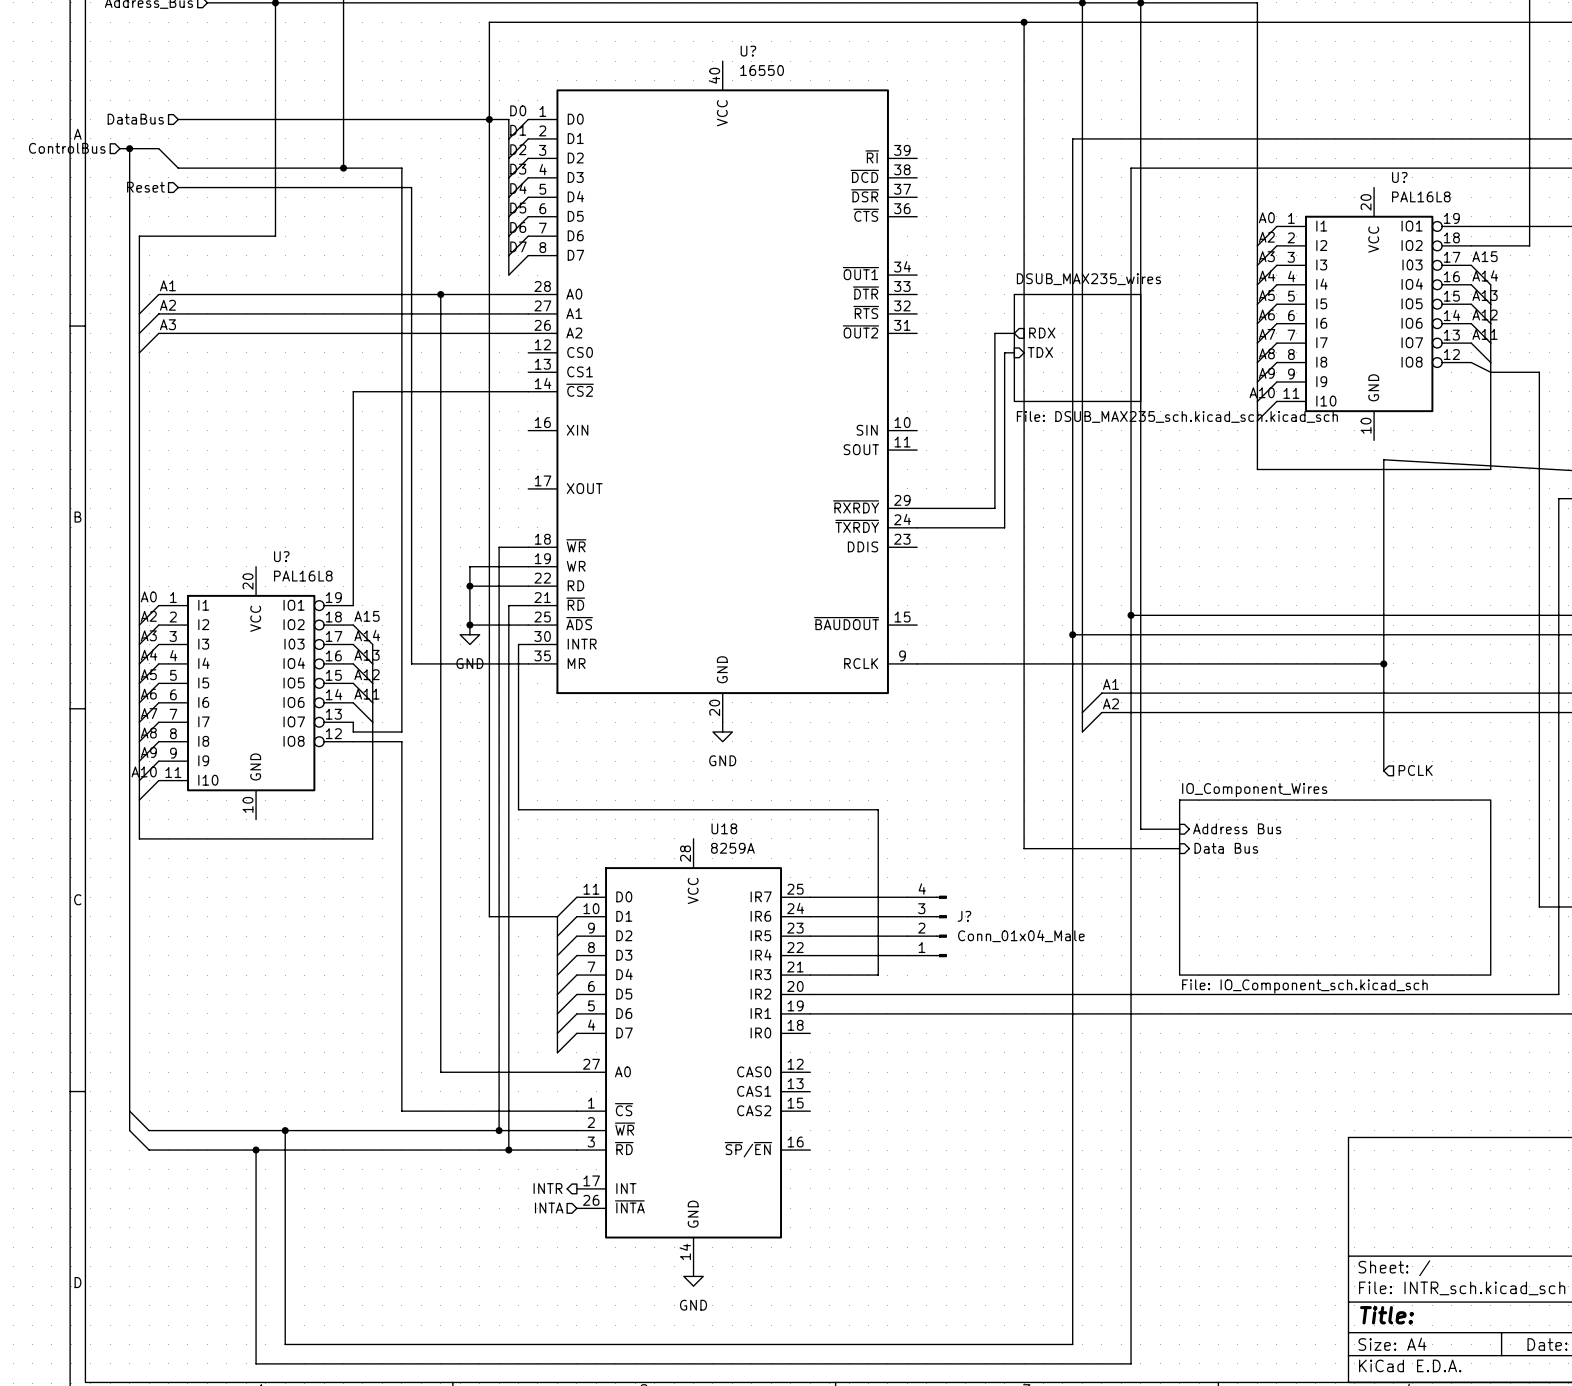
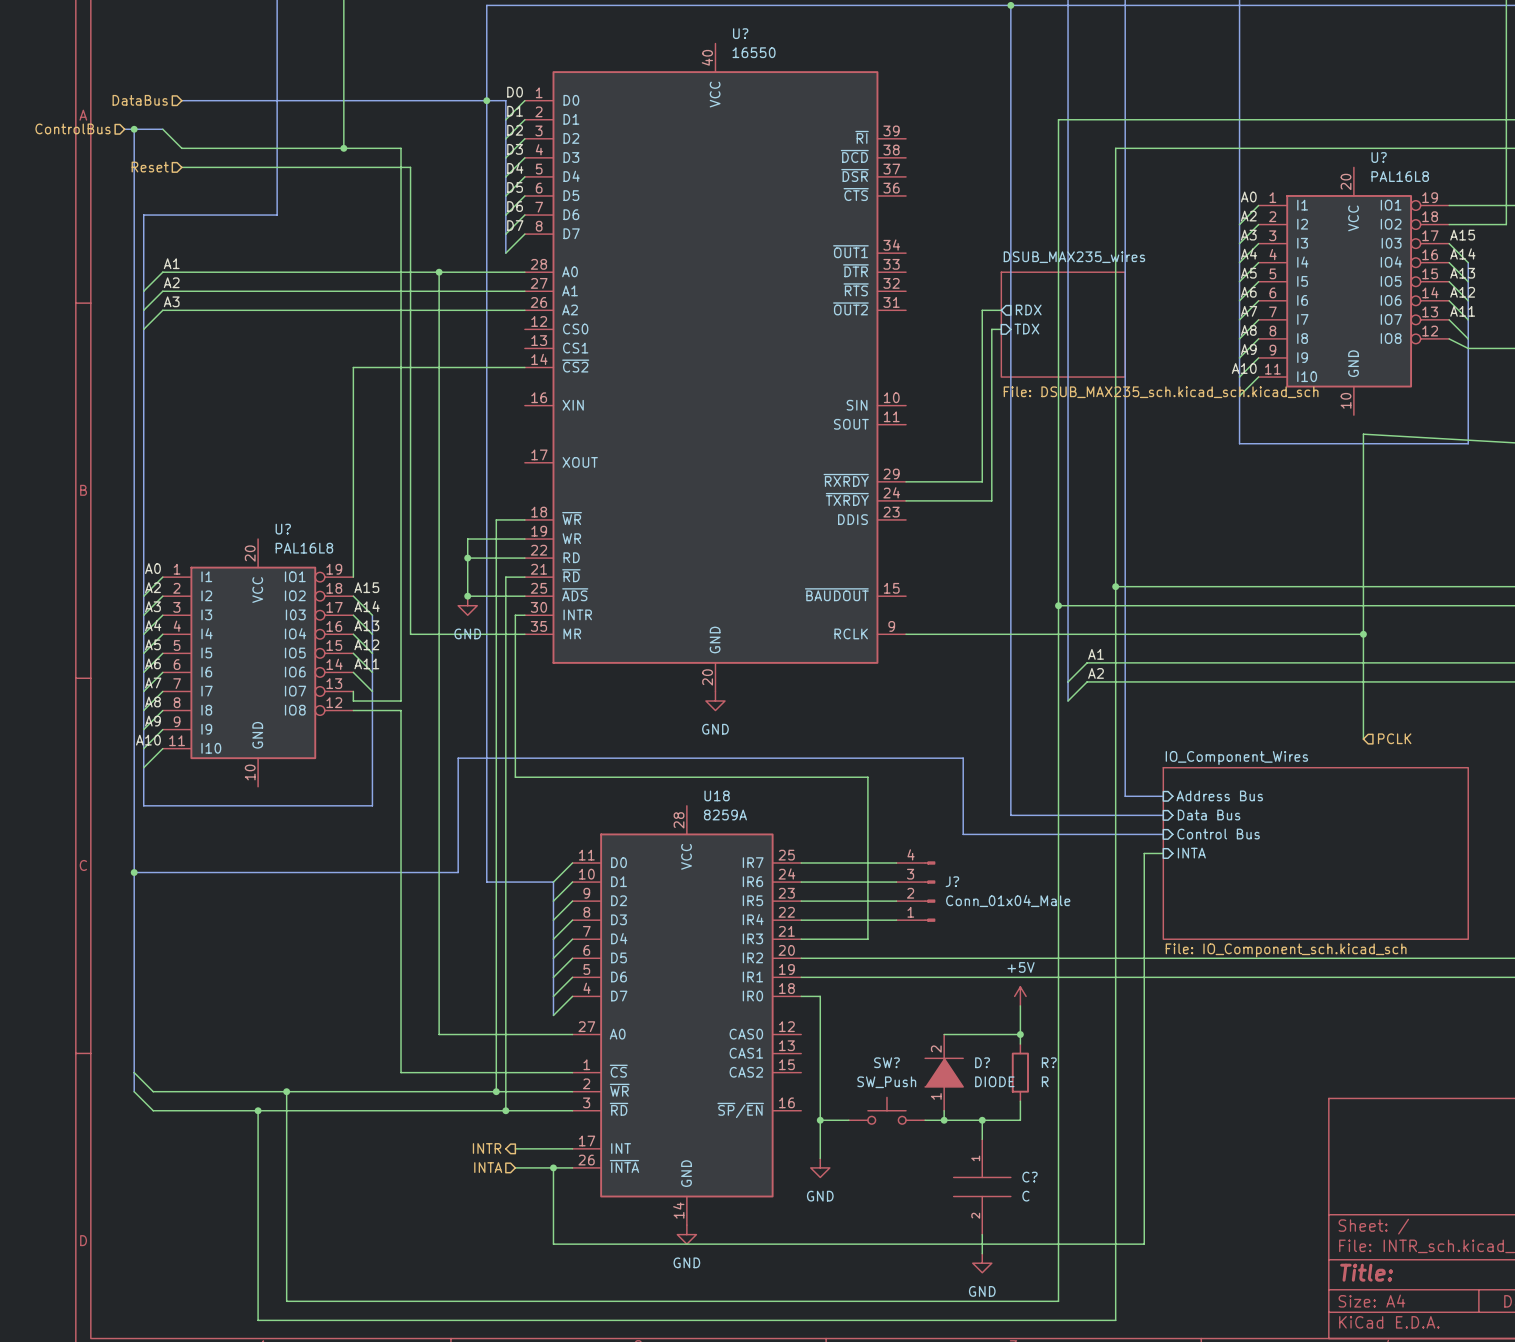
sheet pin: none -> Control Bus (1218, 834)
bus: none -> (1163, 834) (963, 834) (963, 758) (458, 758) (458, 872) (134, 872)
wire: none -> (1163, 853) (1144, 853) (1144, 1244) (553, 1244) (553, 1167)
sheet pin: none -> INTA (1191, 853)
junction: none -> (134, 872)
wire: none -> (801, 996) (820, 996) (820, 1158)
power symbol: none -> +5V (1020, 996)
wire: none -> (1020, 1005) (1020, 1044)
wire: none -> (944, 1034) (1020, 1034)
junction: none -> (1020, 1034)
D?: none -> DIODE (944, 1072)
R?: none -> R (1020, 1072)
wire: none -> (1020, 1101) (1020, 1120) (925, 1120)
SW?: none -> SW_Push (886, 1110)
wire: none -> (944, 1110) (944, 1120)
wire: none -> (820, 1120) (848, 1120)
junction: none -> (820, 1120)
junction: none -> (944, 1120)
wire: none -> (982, 1120) (982, 1139)
junction: none -> (982, 1120)
wire: none -> (515, 1148) (572, 1148)
hierarchical label position: INTR (548, 1188) -> INTR (487, 1148)
wire: none -> (515, 1167) (572, 1167)
hierarchical label position: INTA (549, 1208) -> INTA (488, 1167)
junction: none -> (553, 1167)
power symbol: none -> GND (820, 1167)
C?: none -> C (982, 1186)
wire: none -> (982, 1234) (982, 1253)
power symbol: none -> GND (982, 1263)

